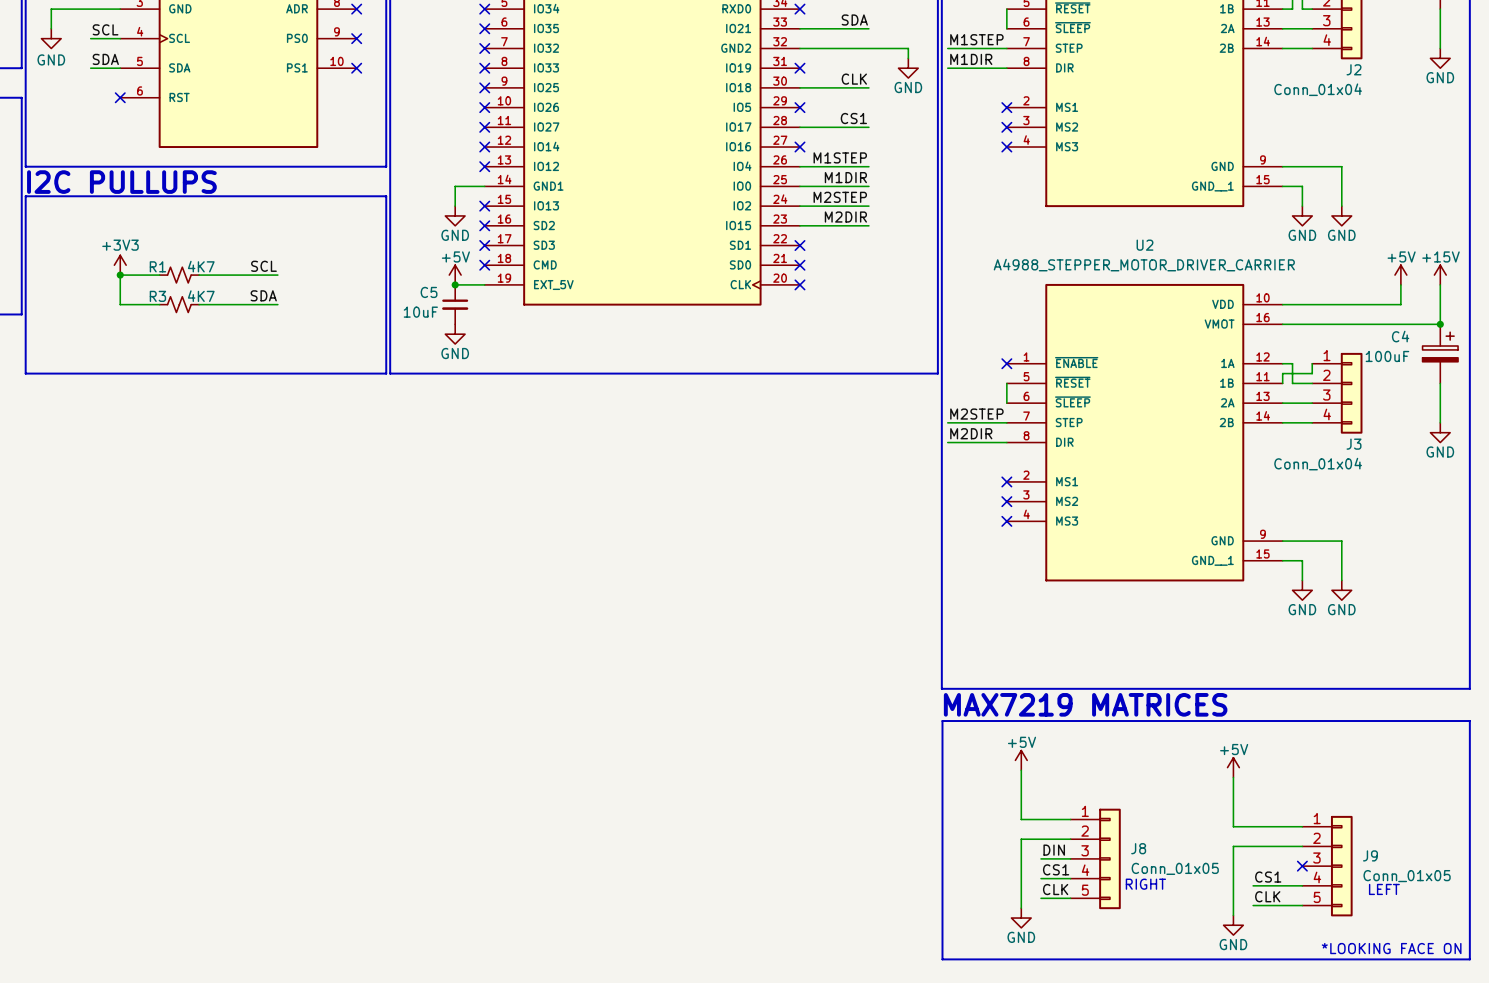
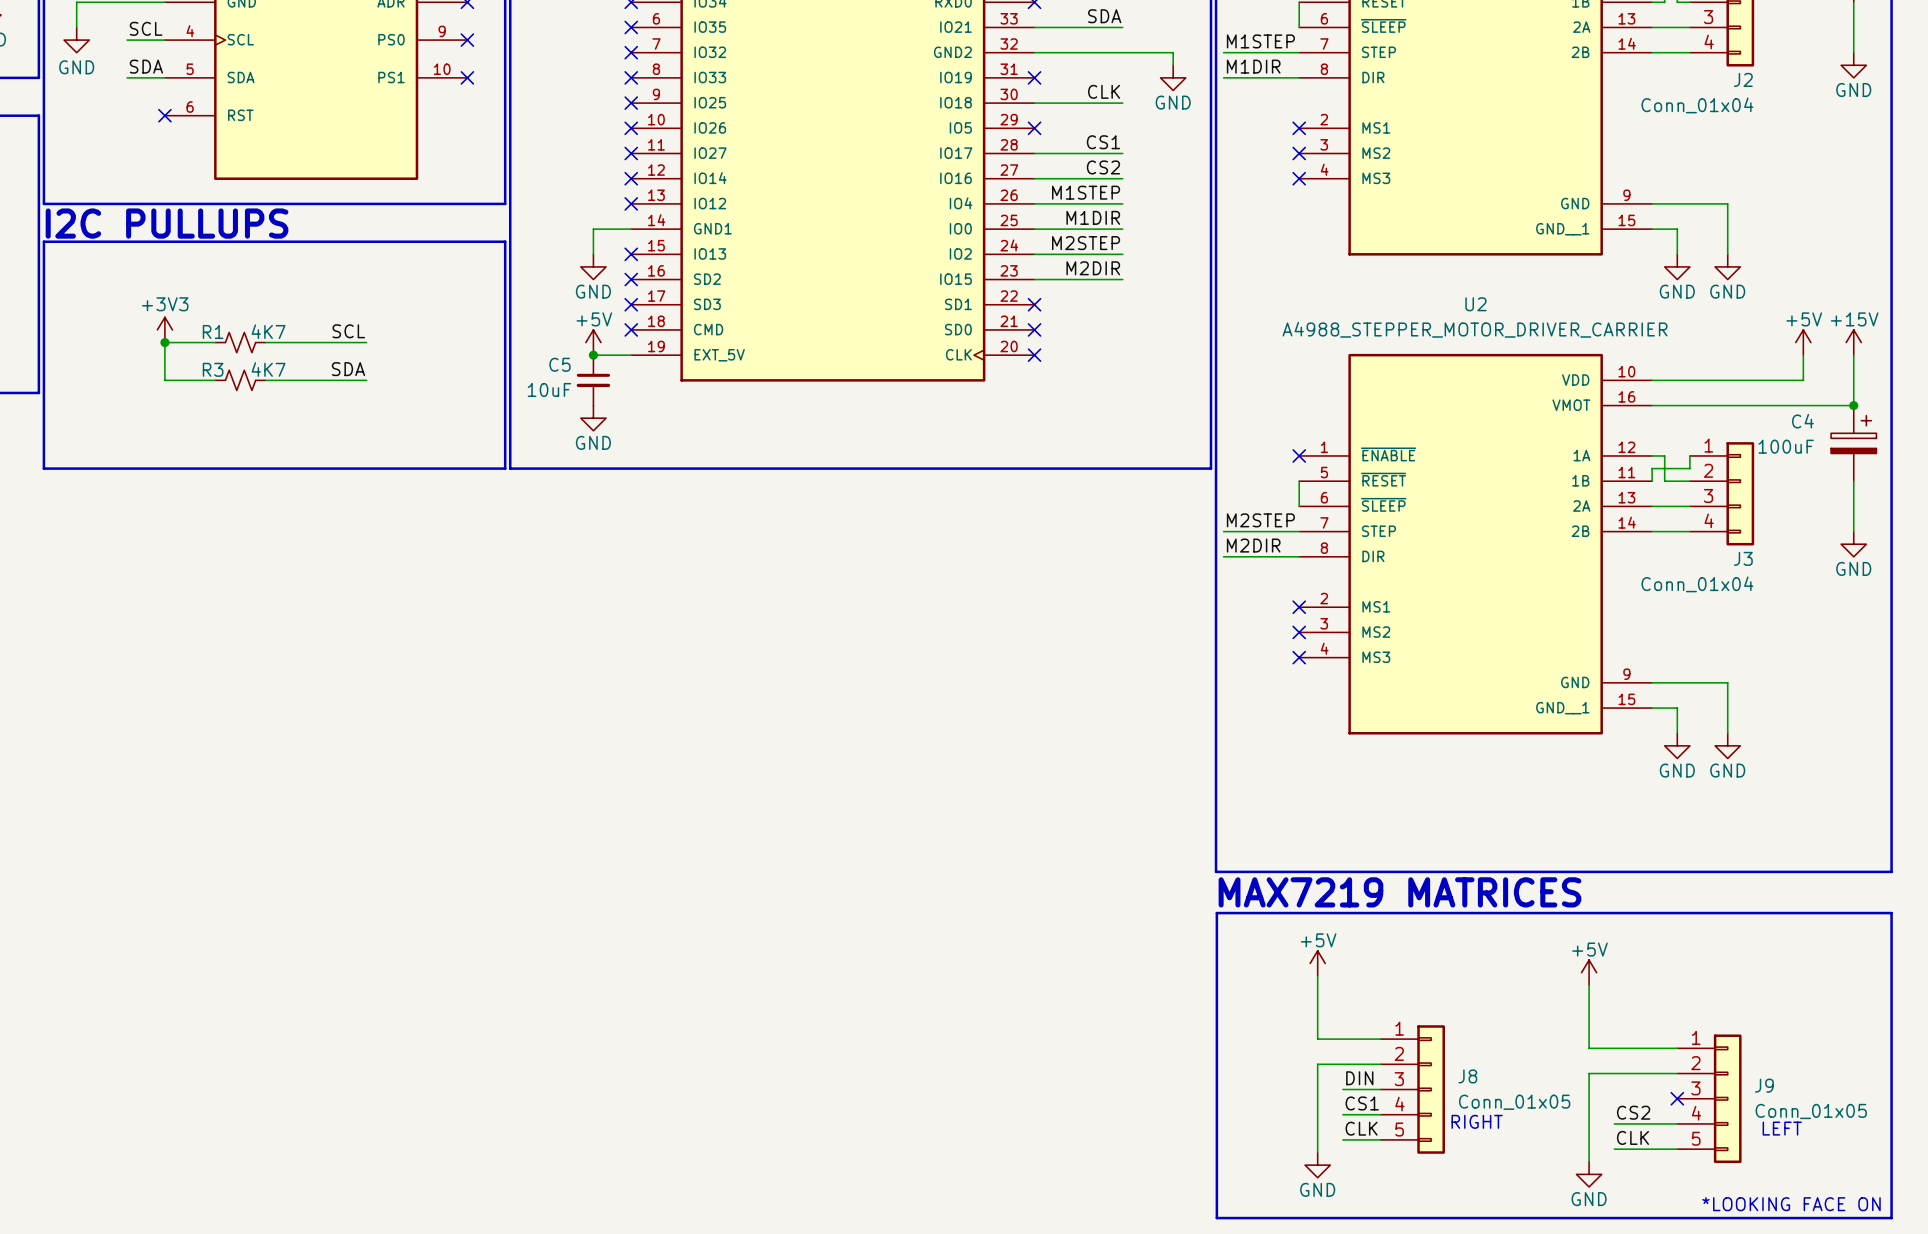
label: none -> CS2 (1103, 167)
wire: none -> (1034, 178) (1122, 178)
no-connect mark: (799, 147) -> none
label: CS1 (1268, 877) -> CS2 (1633, 1112)

